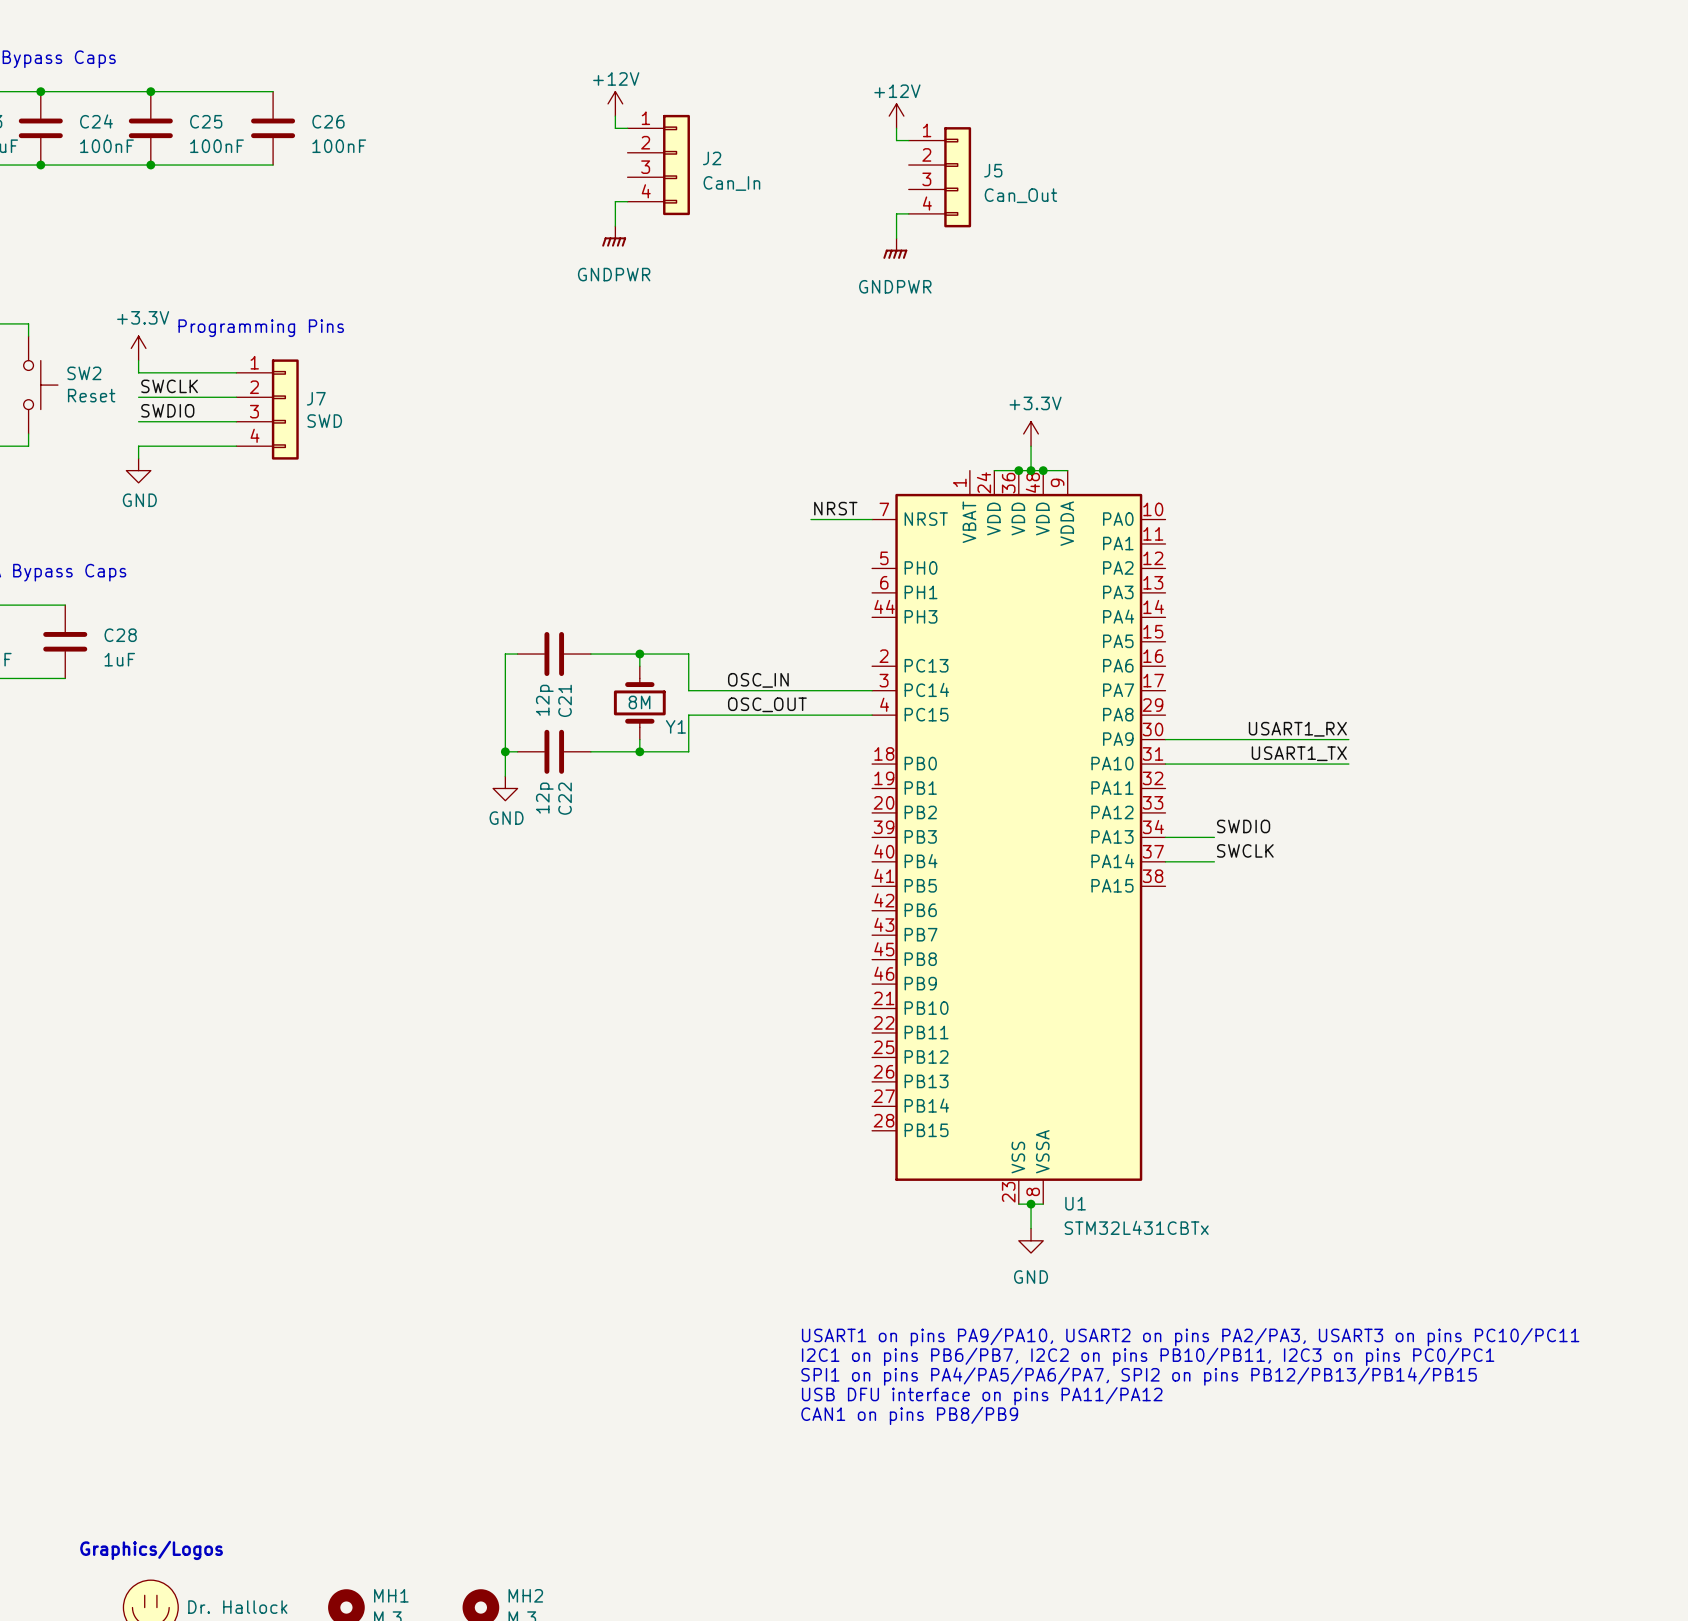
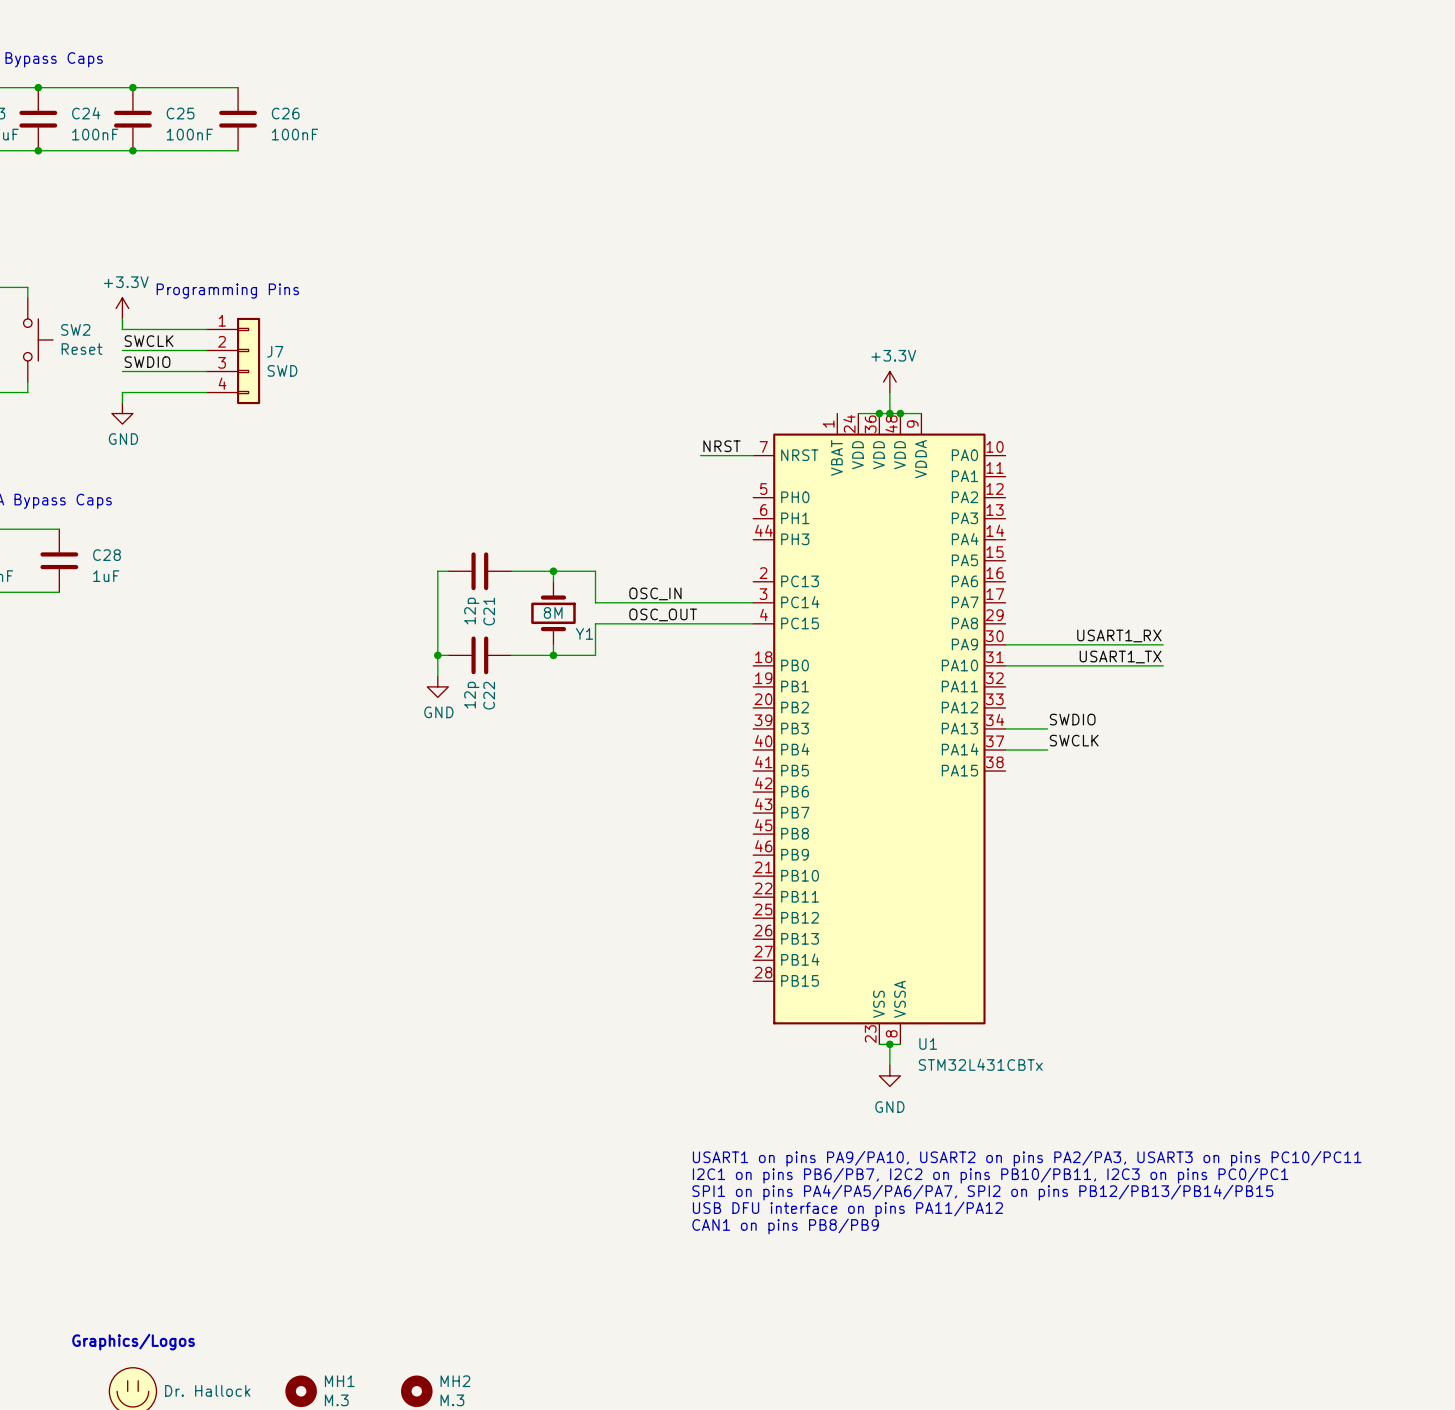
power symbol: +12V (615, 103) -> none
wire: (615, 116) (615, 128) (627, 128) -> none
power symbol: +12V (896, 116) -> none
wire: (896, 128) (896, 140) (908, 140) -> none
J2: Can_In (658, 165) -> none
J5: Can_Out (939, 177) -> none
wire: (627, 201) (615, 201) (615, 226) -> none
wire: (908, 213) (896, 213) (896, 238) -> none
power symbol: GNDPWR (614, 236) -> none
power symbol: GNDPWR (895, 248) -> none

